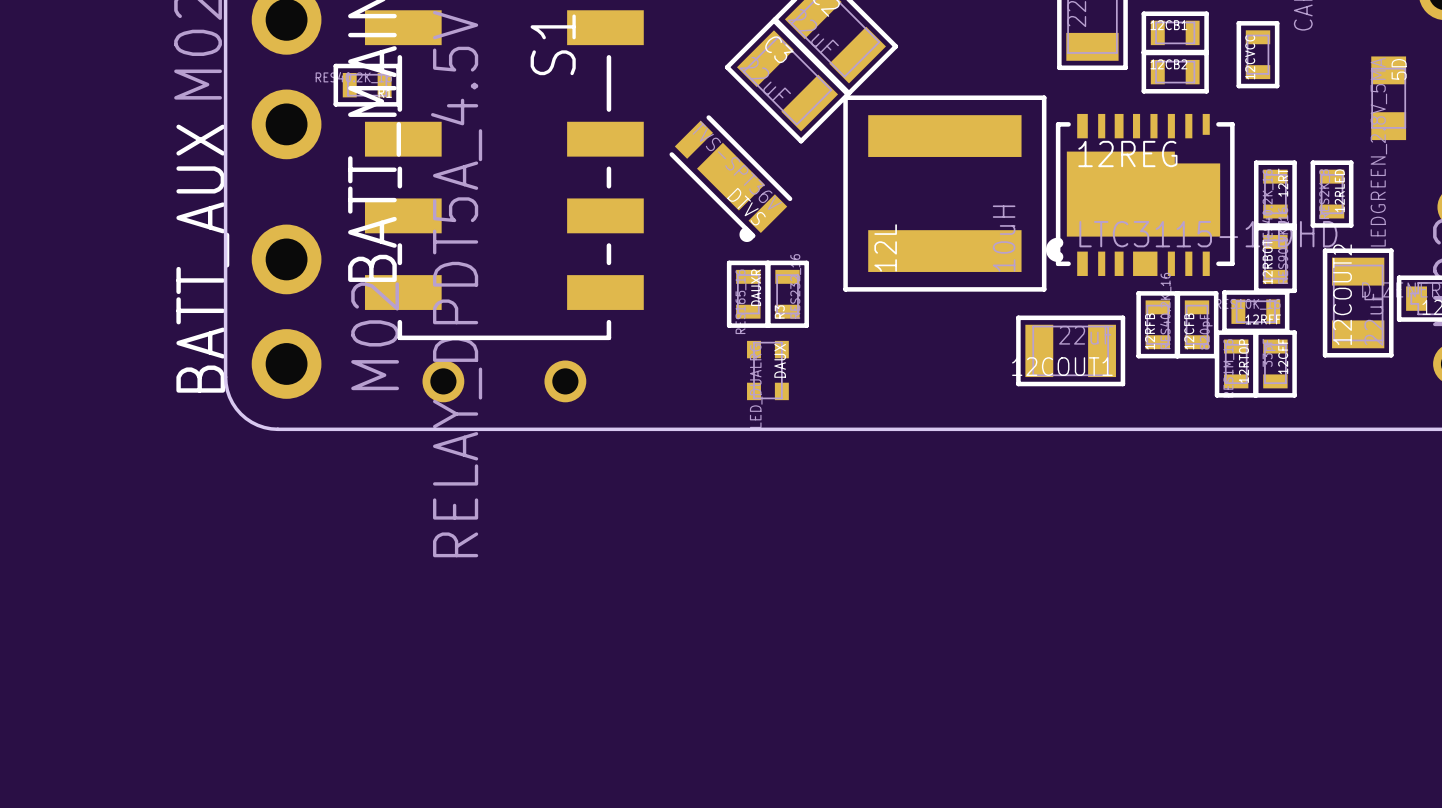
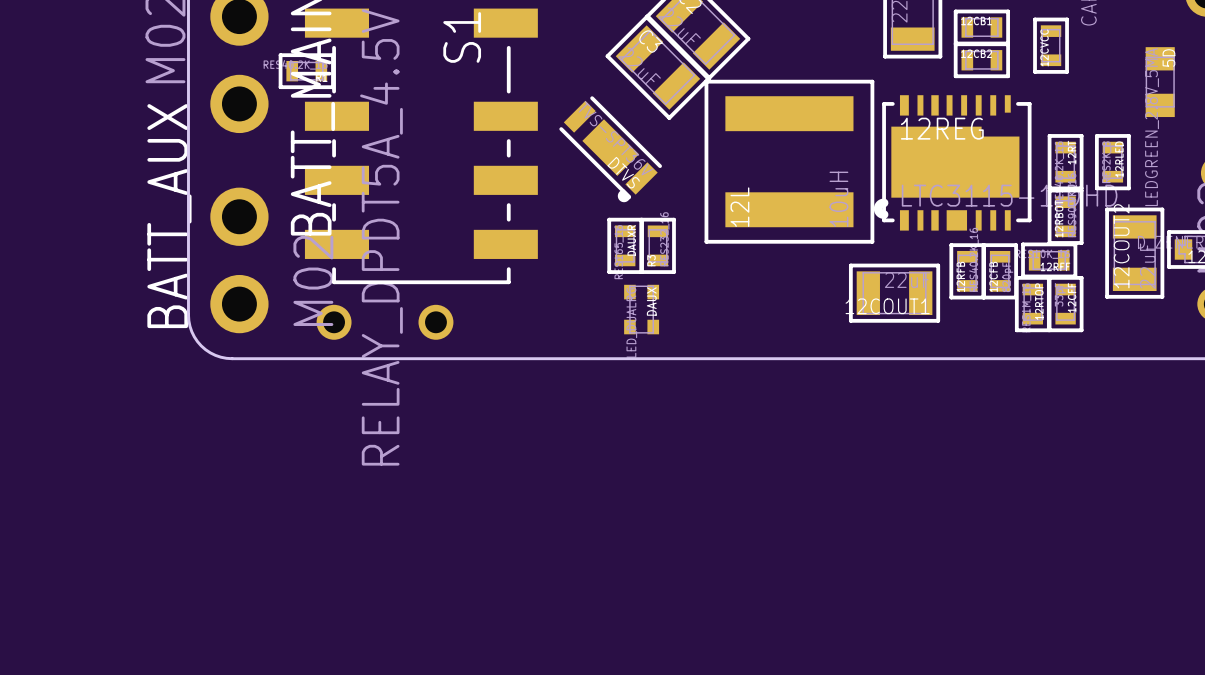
part: (443, 381) -> none
part: (565, 381) -> none
part: none -> (334, 322)
part: none -> (435, 322)

